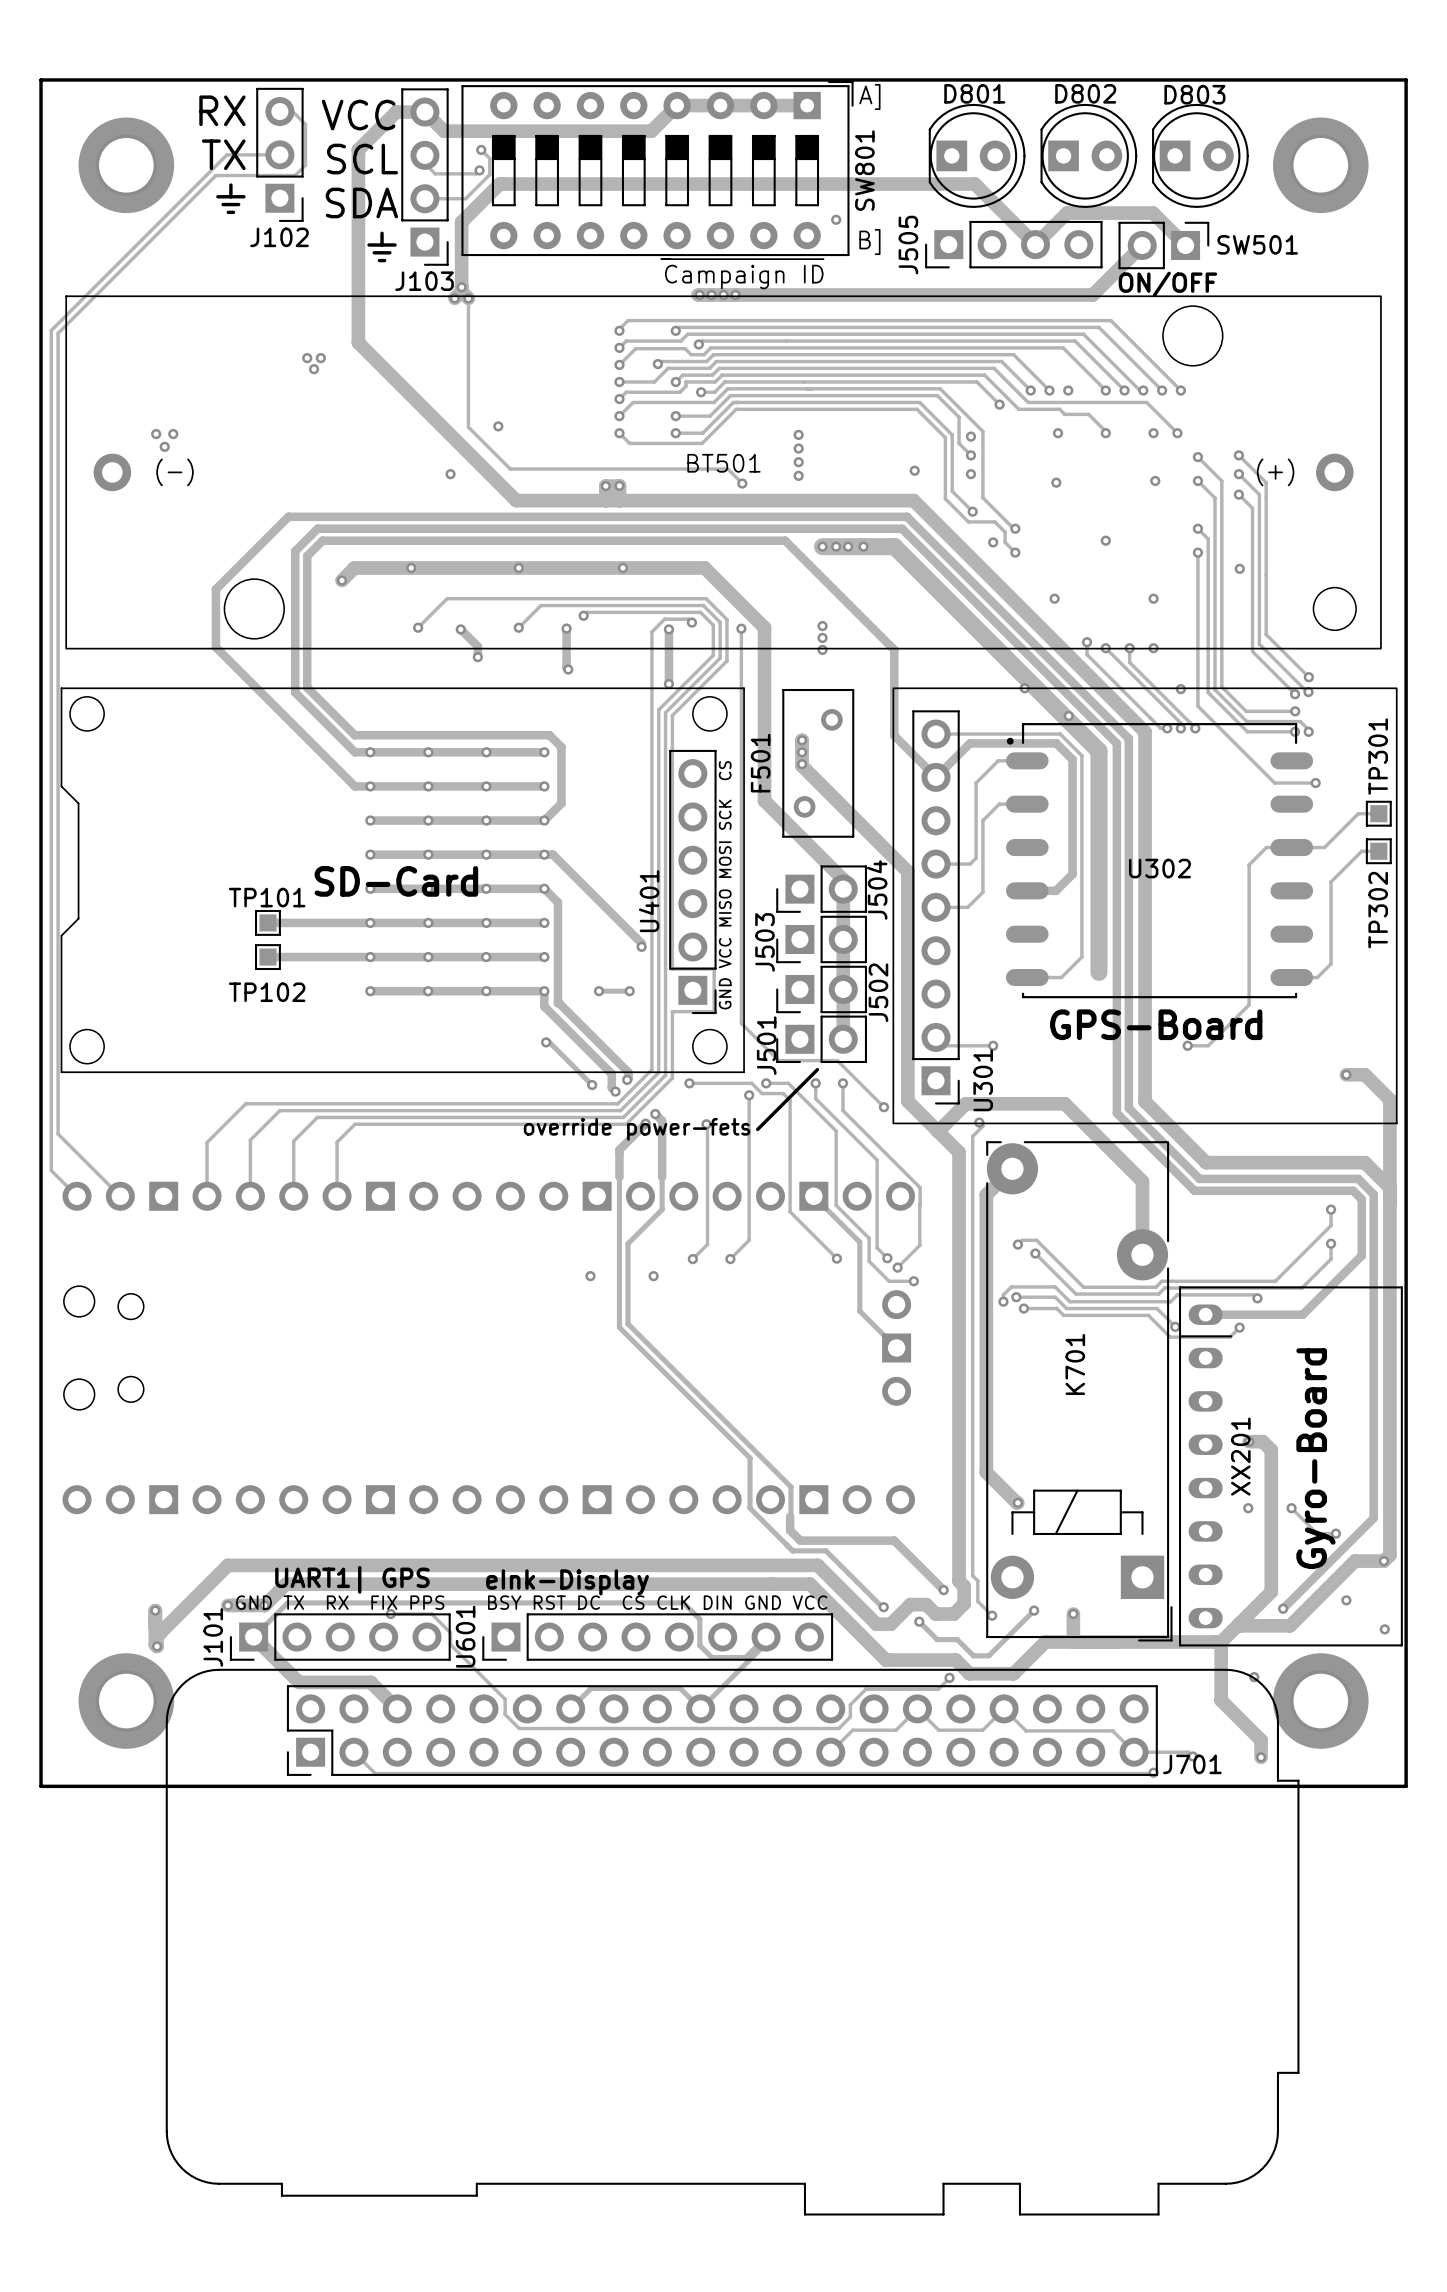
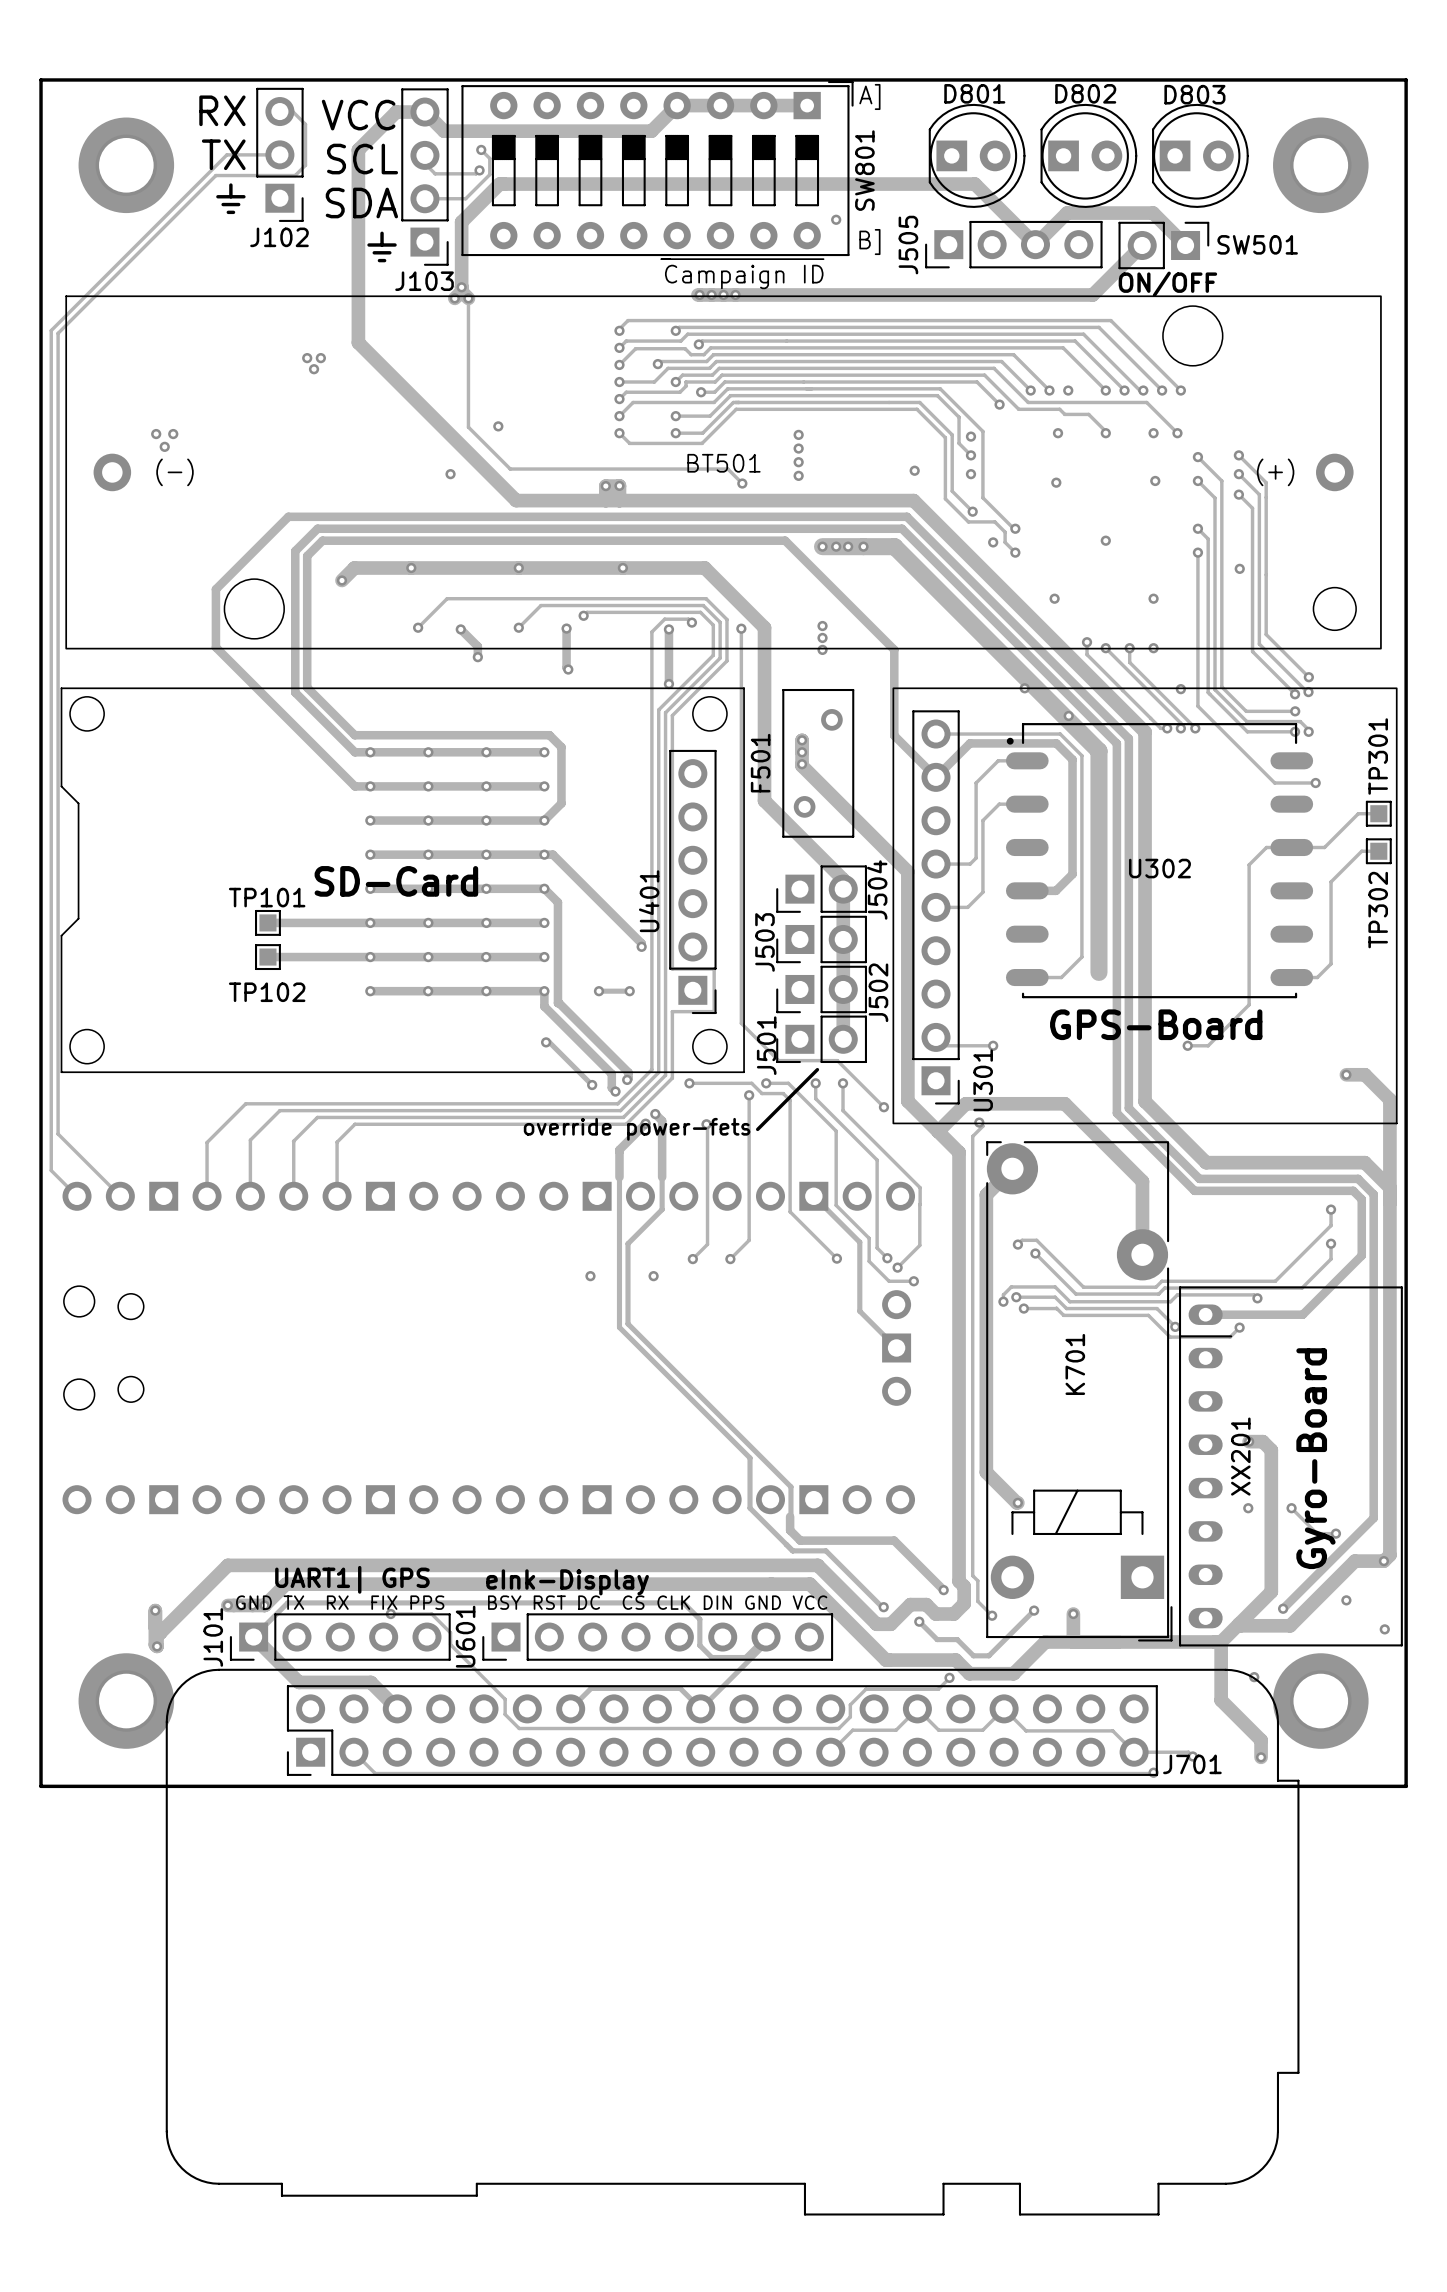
text: GND VCC MISO MOSI SCK CS (725, 885) -> none

